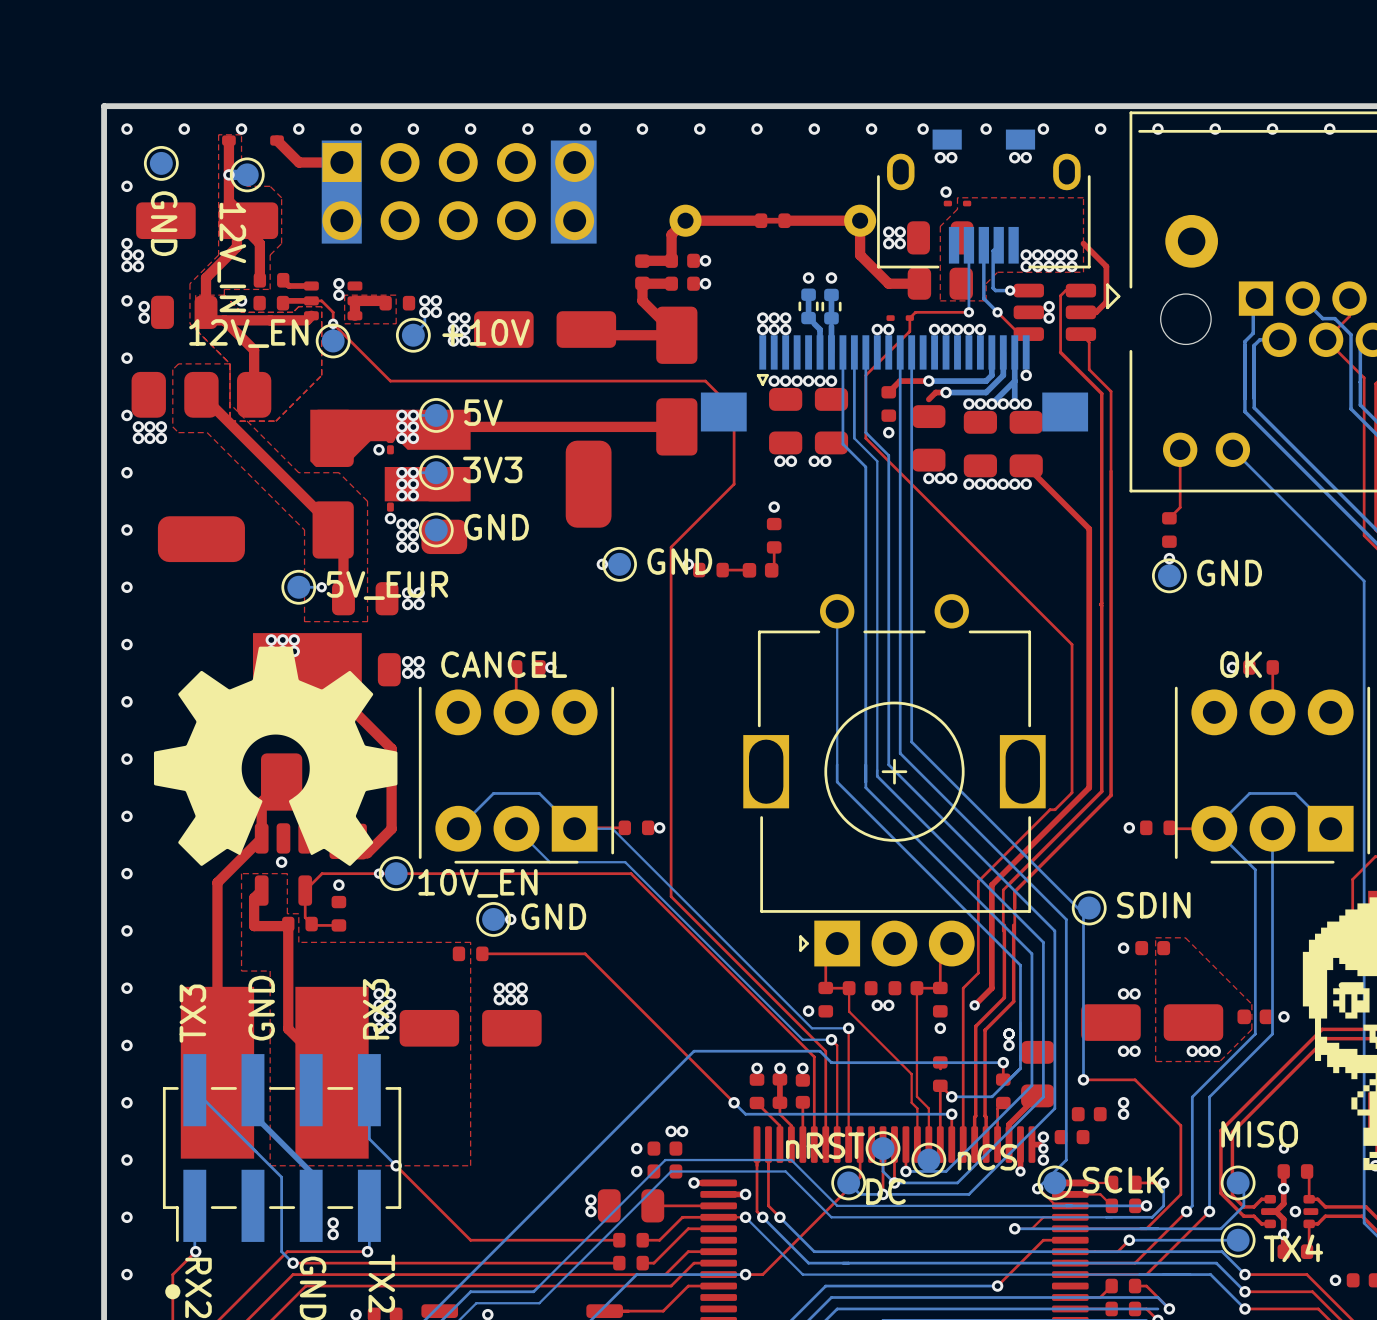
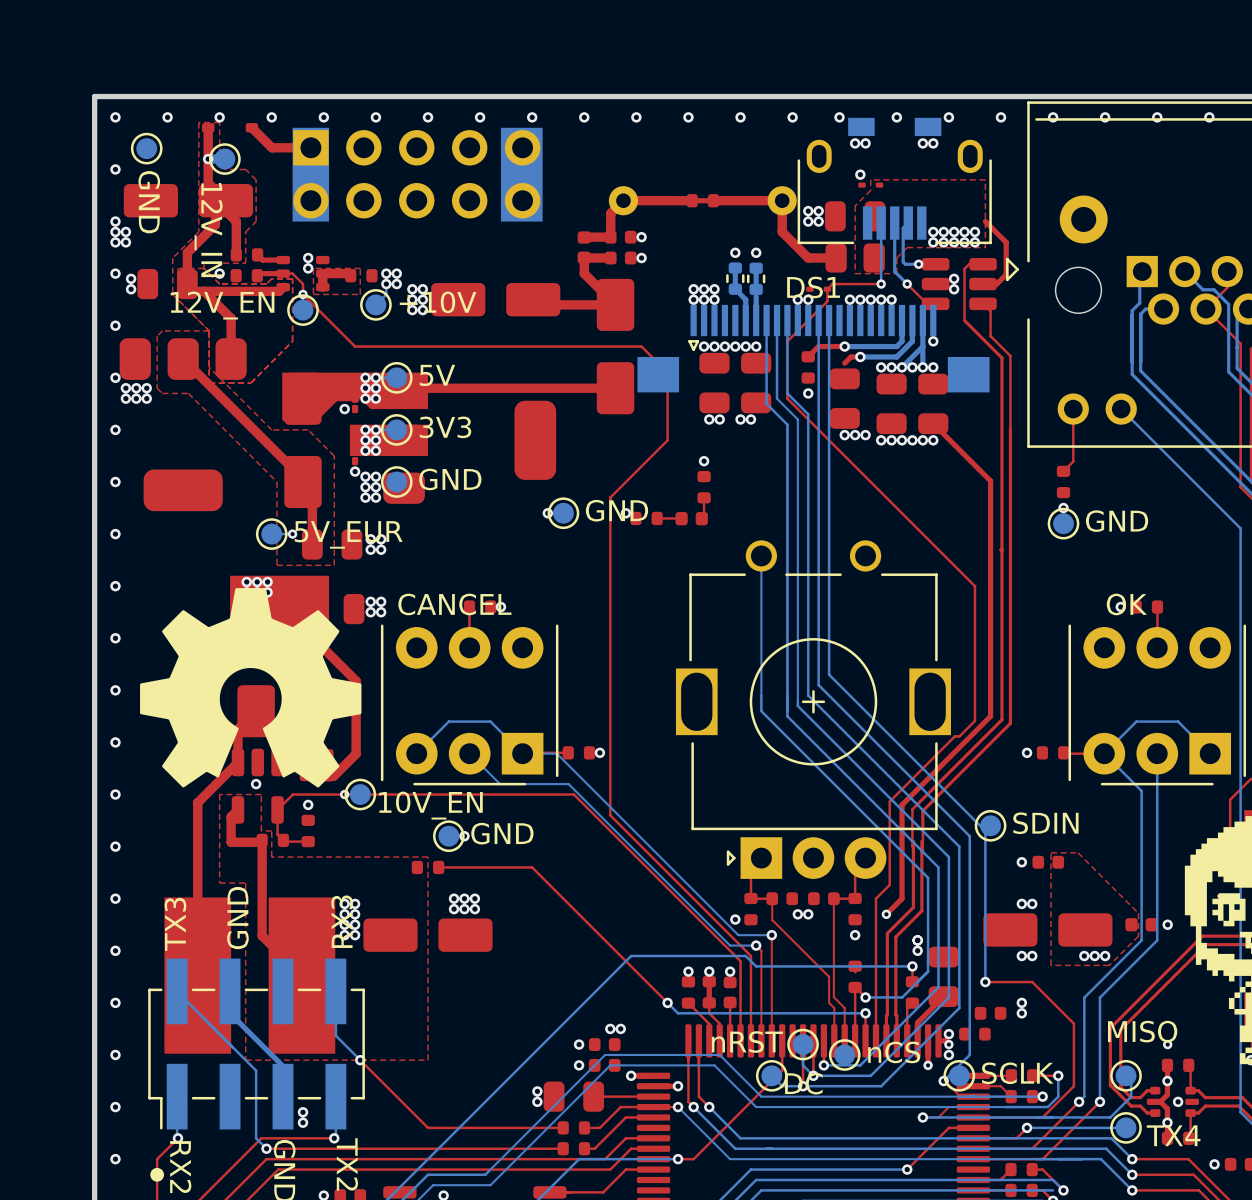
DS1 name: none -> DS1 (813, 287)

